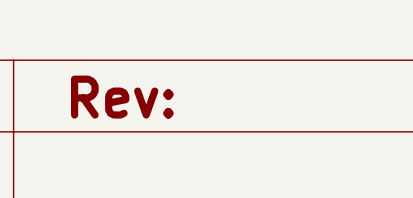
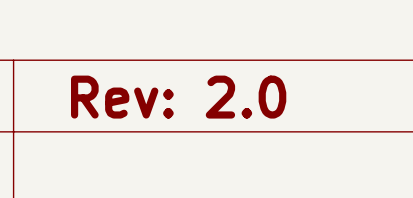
title block: Rev: (122, 97) -> Rev: 2.0 (178, 97)

